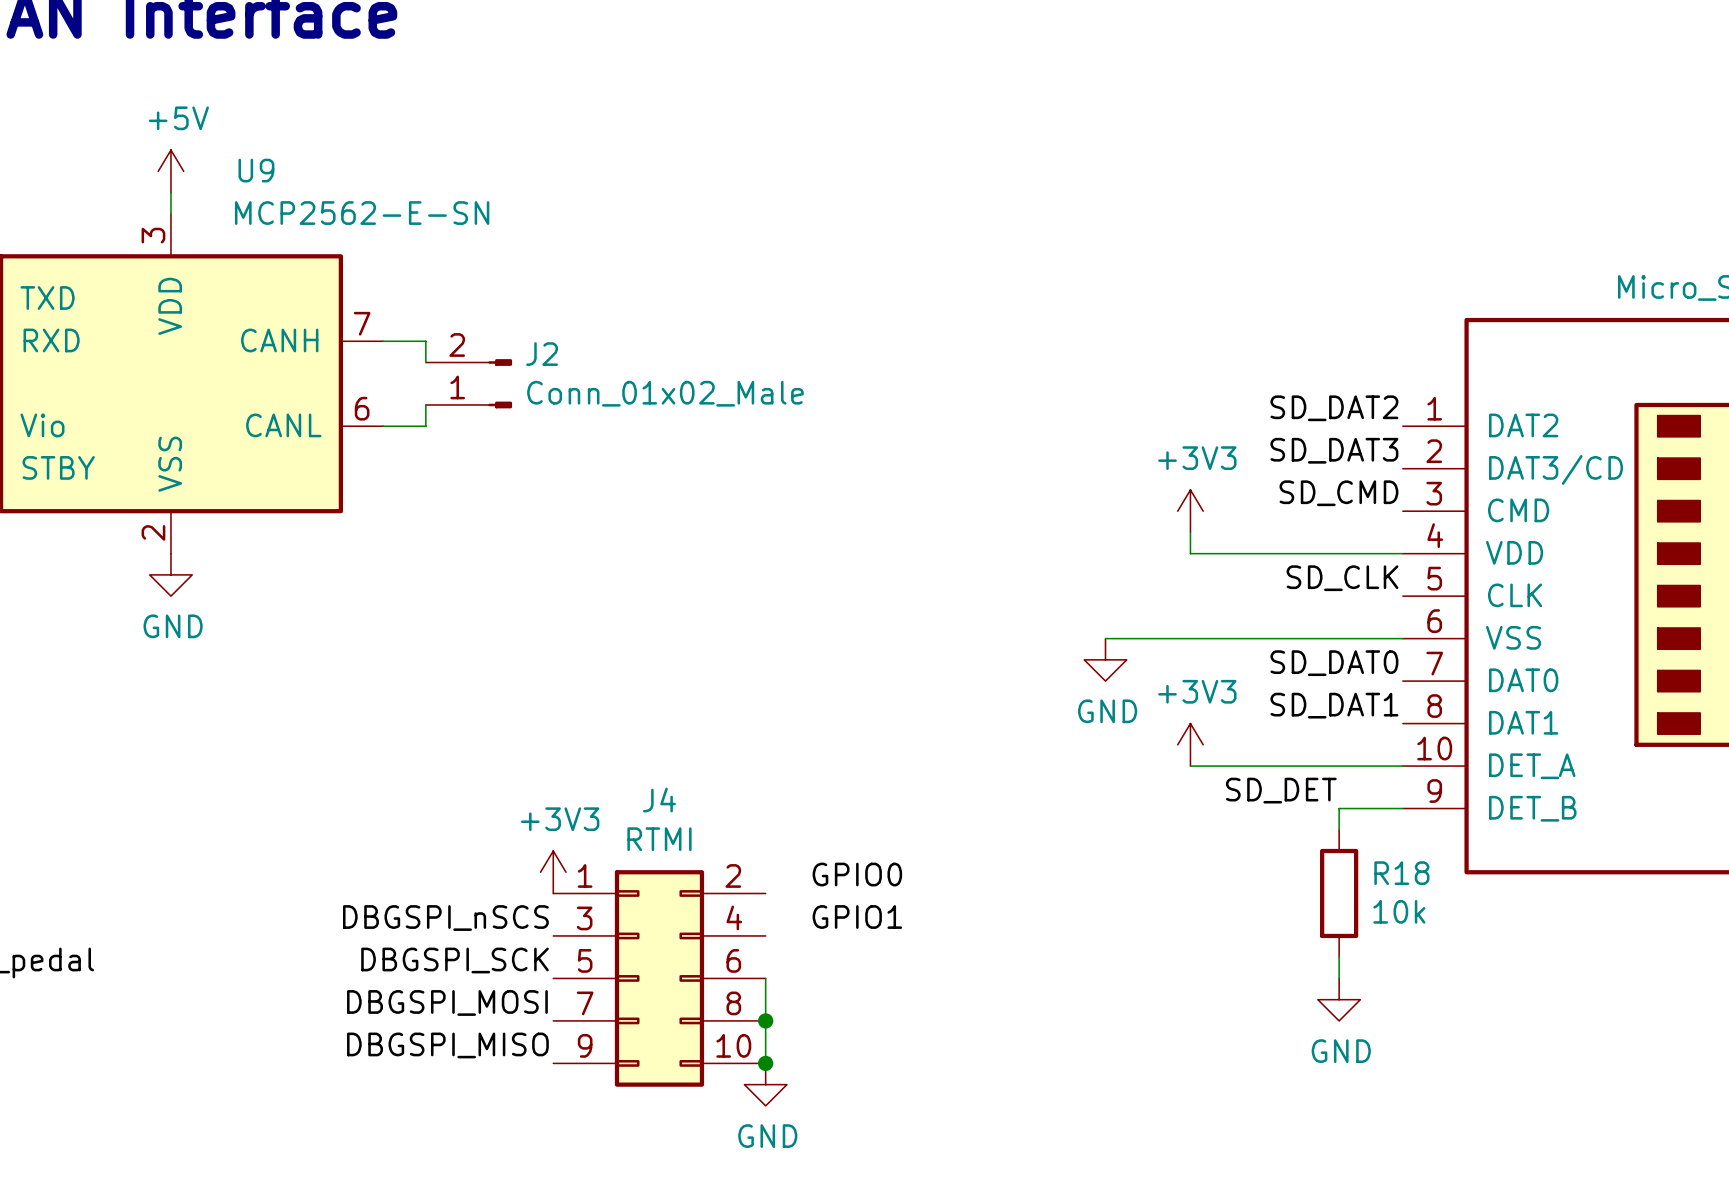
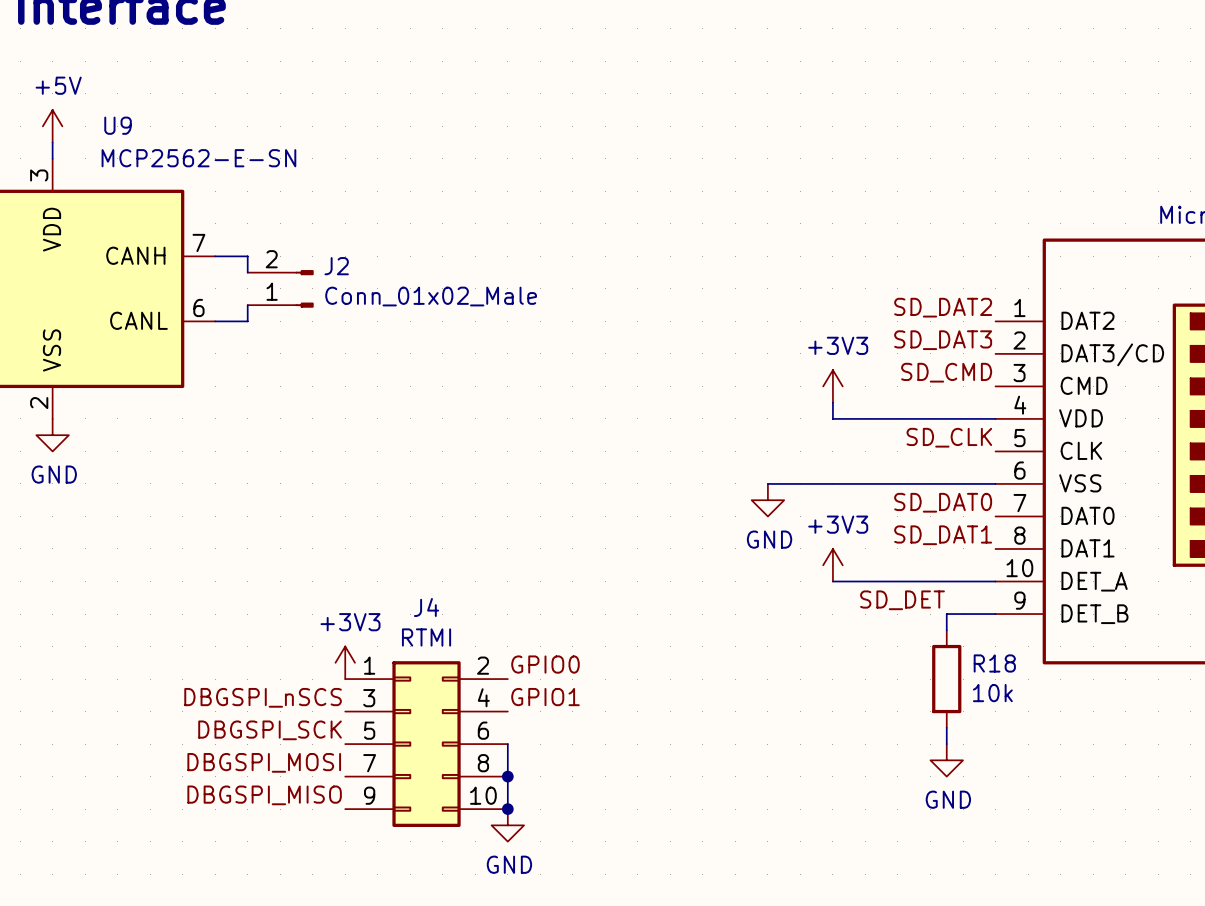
label position: GPIO0 (857, 874) -> GPIO0 (545, 664)
label position: GPIO1 (857, 917) -> GPIO1 (545, 697)

